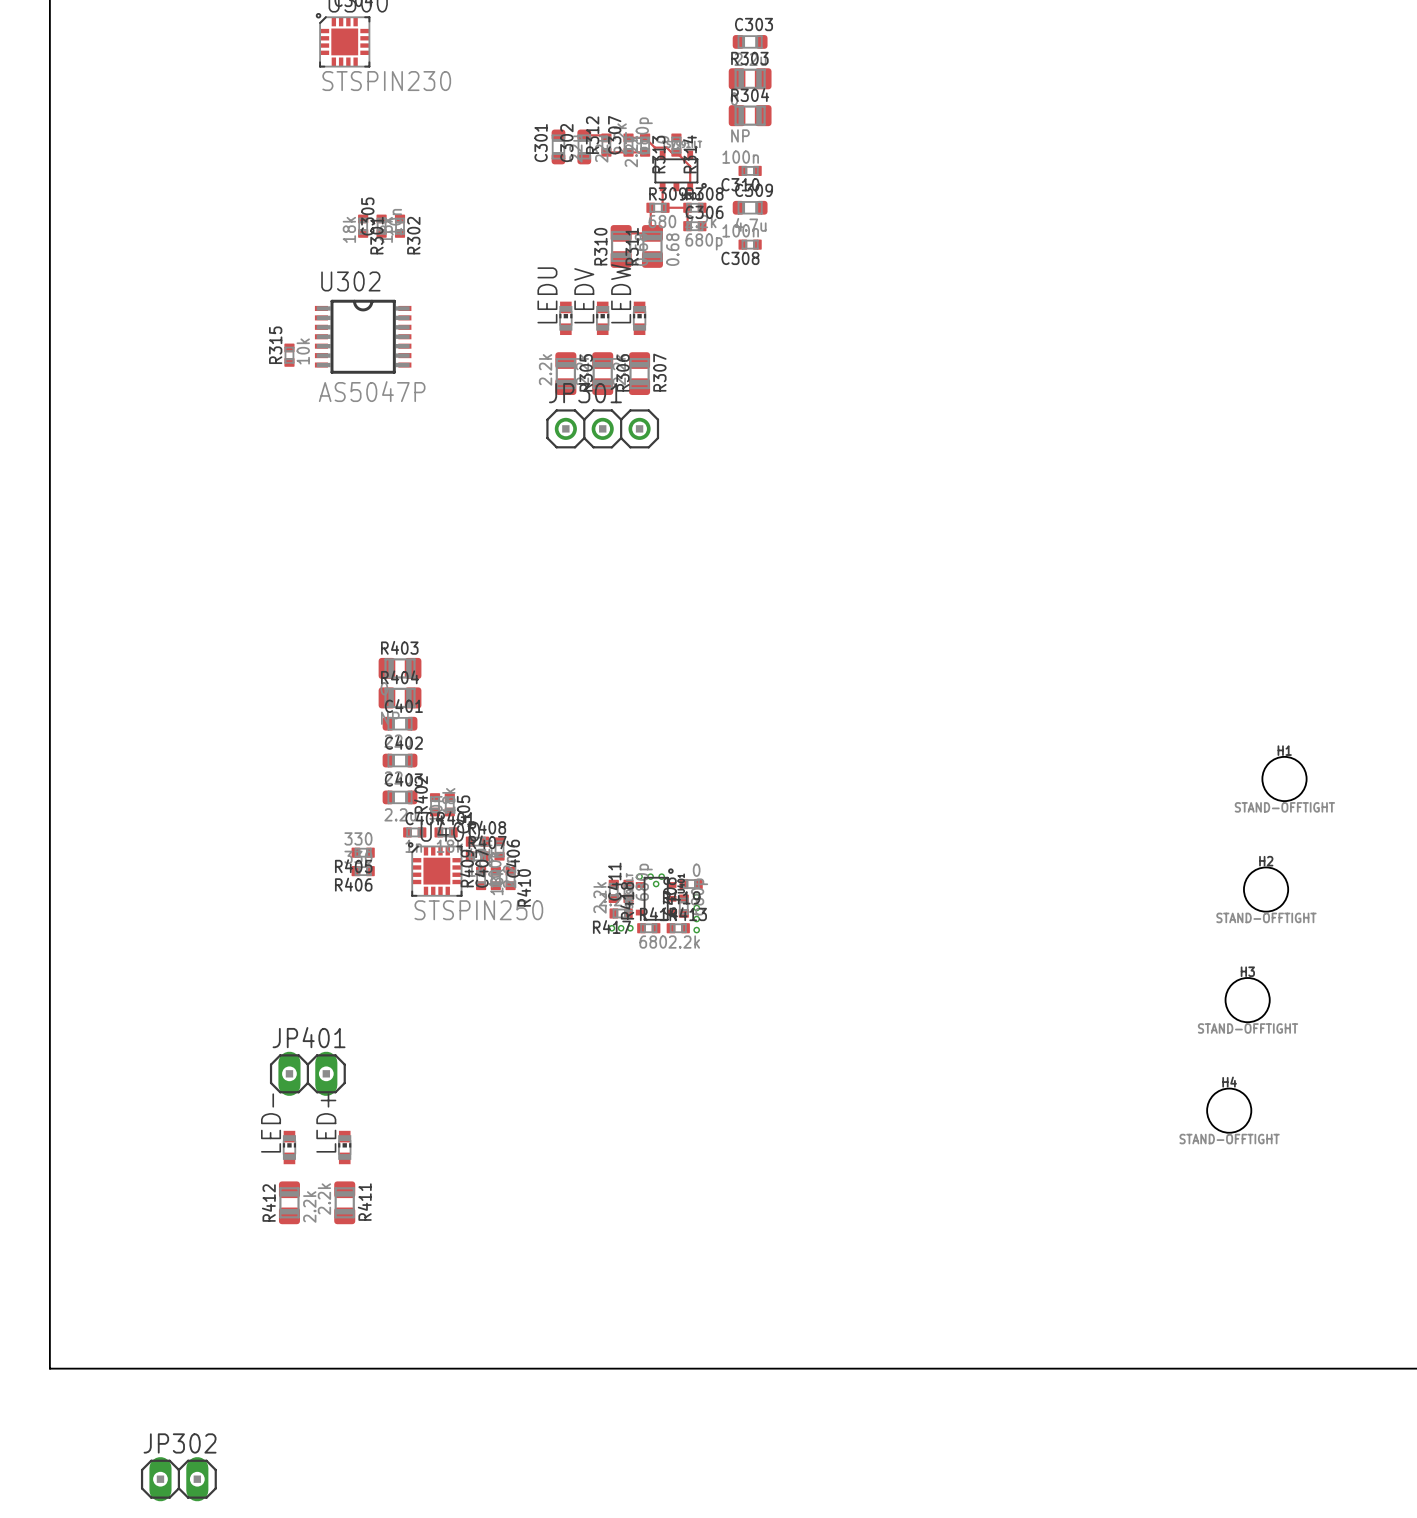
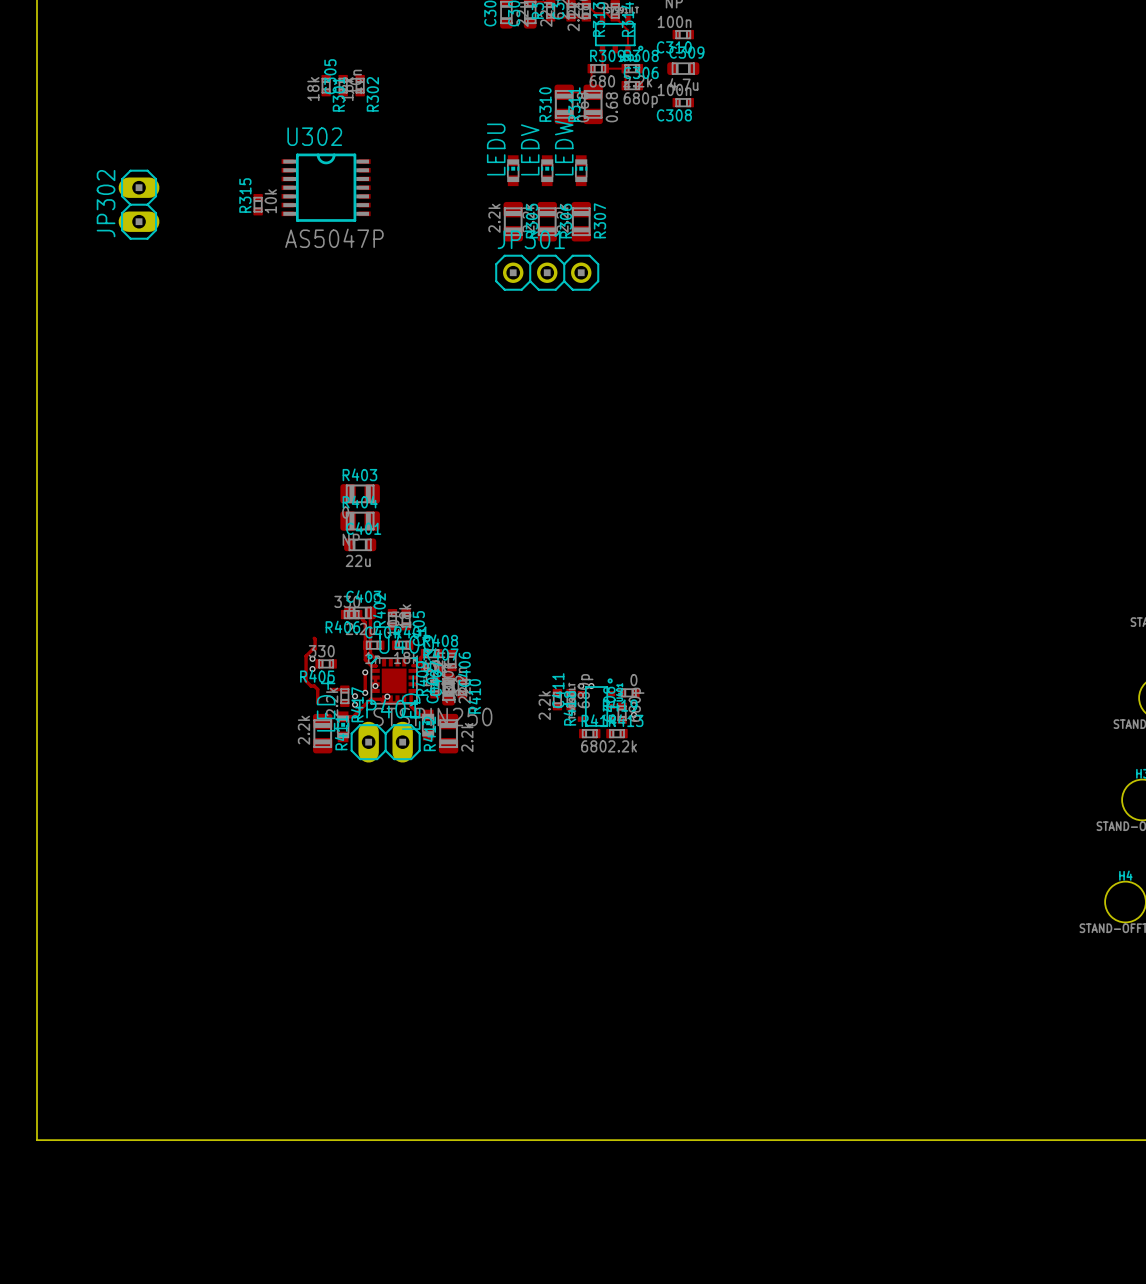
C402 rotation: 0° (400, 760) -> 90° clockwise (448, 689)
C402 position: (400, 760) -> (448, 689)
track: none -> (358, 614) (365, 622) (365, 659) (371, 666) (375, 665)
track: none -> (370, 614) (370, 653) (375, 658)
track: none -> (314, 638) (315, 649) (306, 656) (306, 681) (317, 689) (317, 703)
track: none -> (424, 653) (417, 665) (412, 665)
via: none -> (312, 658)
via: none -> (312, 669)
track: none -> (365, 672) (365, 692)
via: none -> (365, 672)
track: none -> (375, 679) (375, 685)
R406 position: (363, 871) -> (351, 614)
via: none -> (375, 686)
via: (661, 876) -> none
track: none -> (331, 689) (344, 689)
via: none -> (365, 692)
via: (656, 884) -> none
track: none -> (411, 694) (411, 706) (419, 715) (428, 715)
via: none -> (355, 696)
via: none -> (387, 696)
track: none -> (399, 703) (384, 703) (380, 699) (370, 699) (353, 716) (343, 716)
via: none -> (355, 704)
R417 rotation: 0° (621, 913) -> 90° clockwise (344, 696)
R417 position: (621, 913) -> (344, 696)
via: (696, 919) -> none
via: (611, 928) -> none
via: (621, 928) -> none
via: (630, 928) -> none
via: (696, 930) -> none
JP401 position: (307, 1073) -> (385, 742)
LED- position: (289, 1147) -> (428, 725)
LED+ position: (344, 1147) -> (343, 726)
R412 position: (289, 1202) -> (448, 733)
R411 position: (344, 1202) -> (322, 733)
JP302 name position: JP302 (180, 1443) -> JP302 (106, 203)
JP302 rotation: 0° (178, 1479) -> 90° clockwise (139, 204)
JP302 position: (178, 1479) -> (139, 204)

